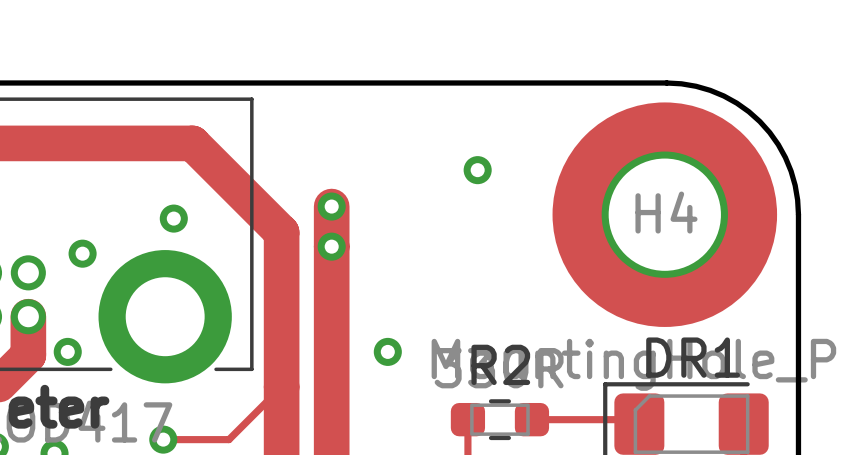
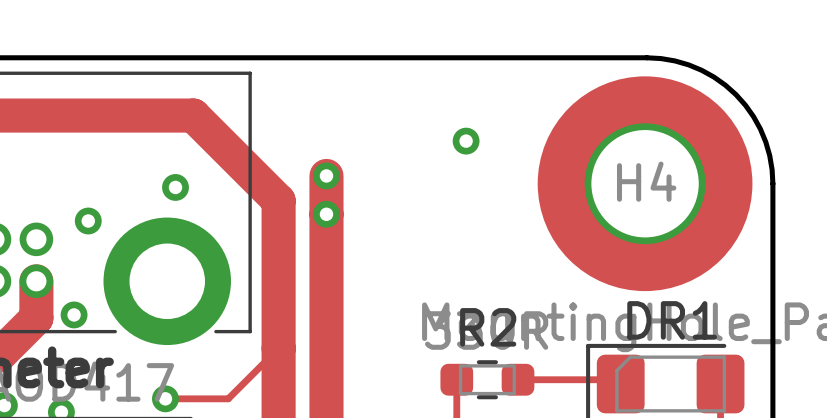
via: (387, 351) -> none

